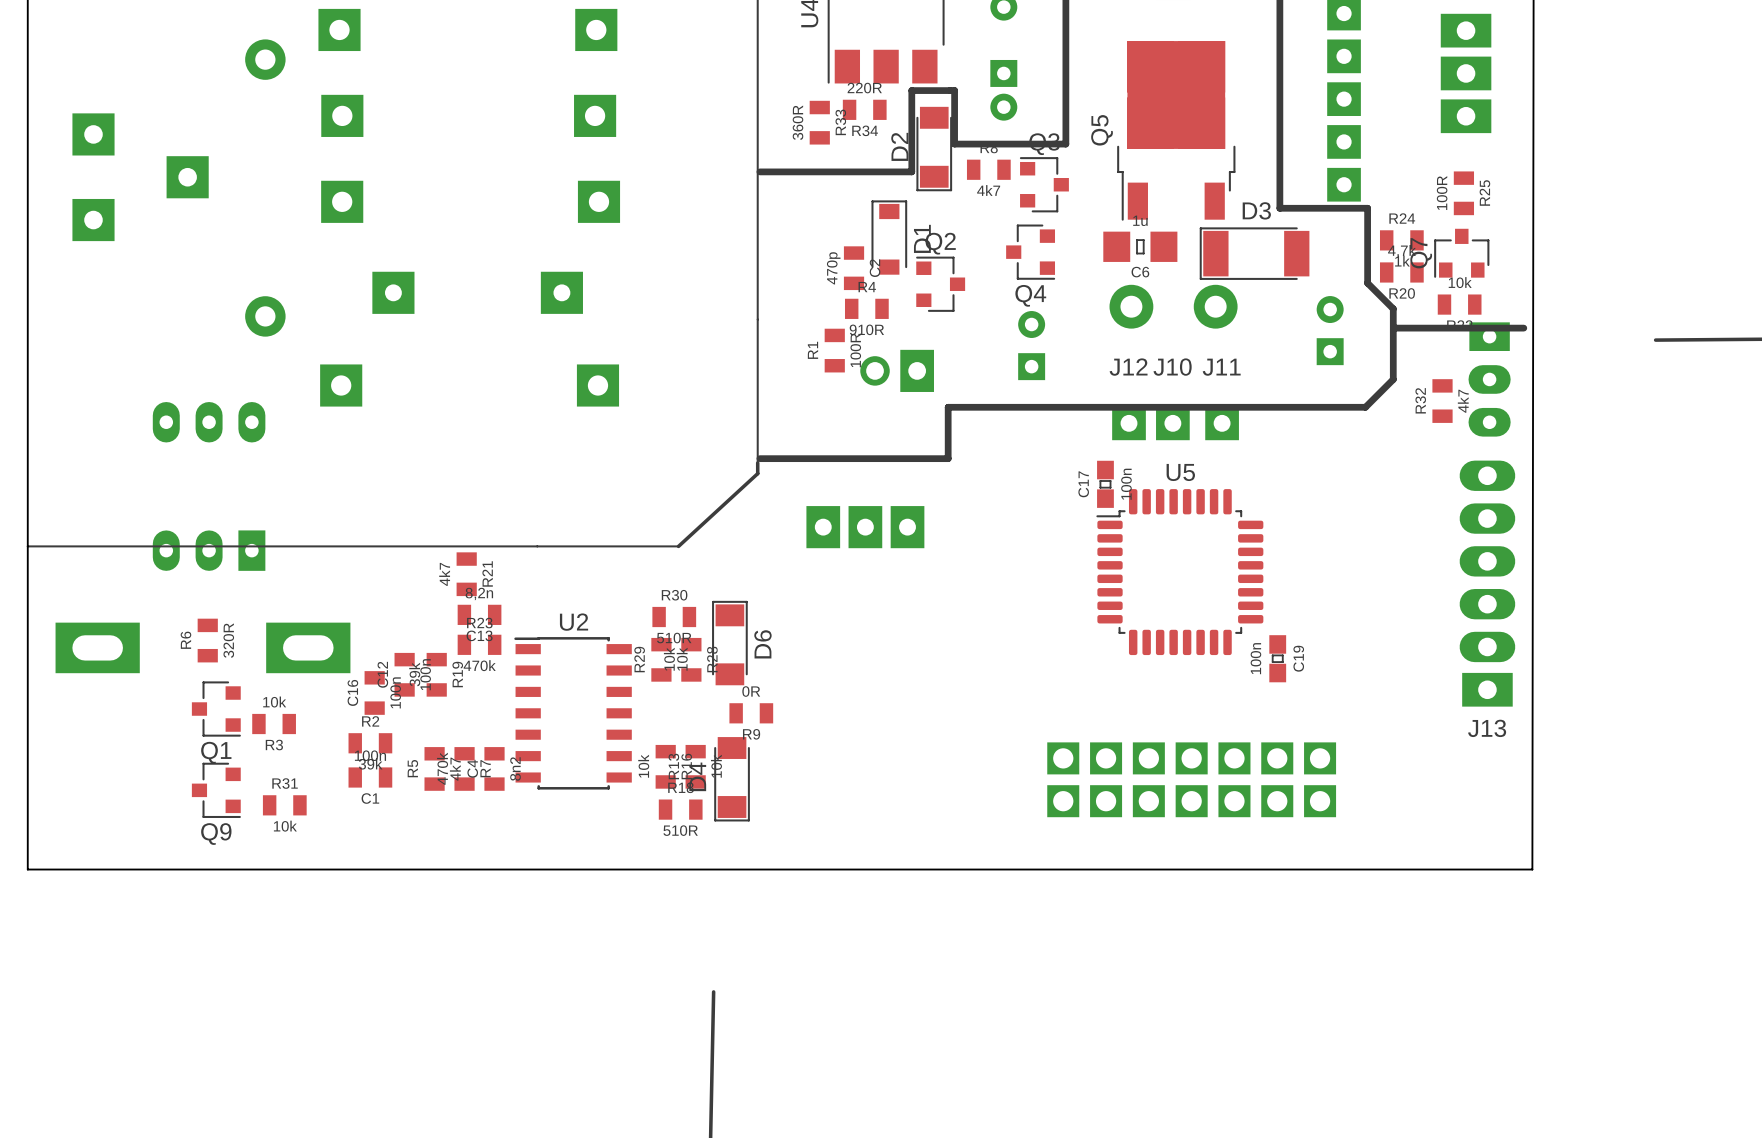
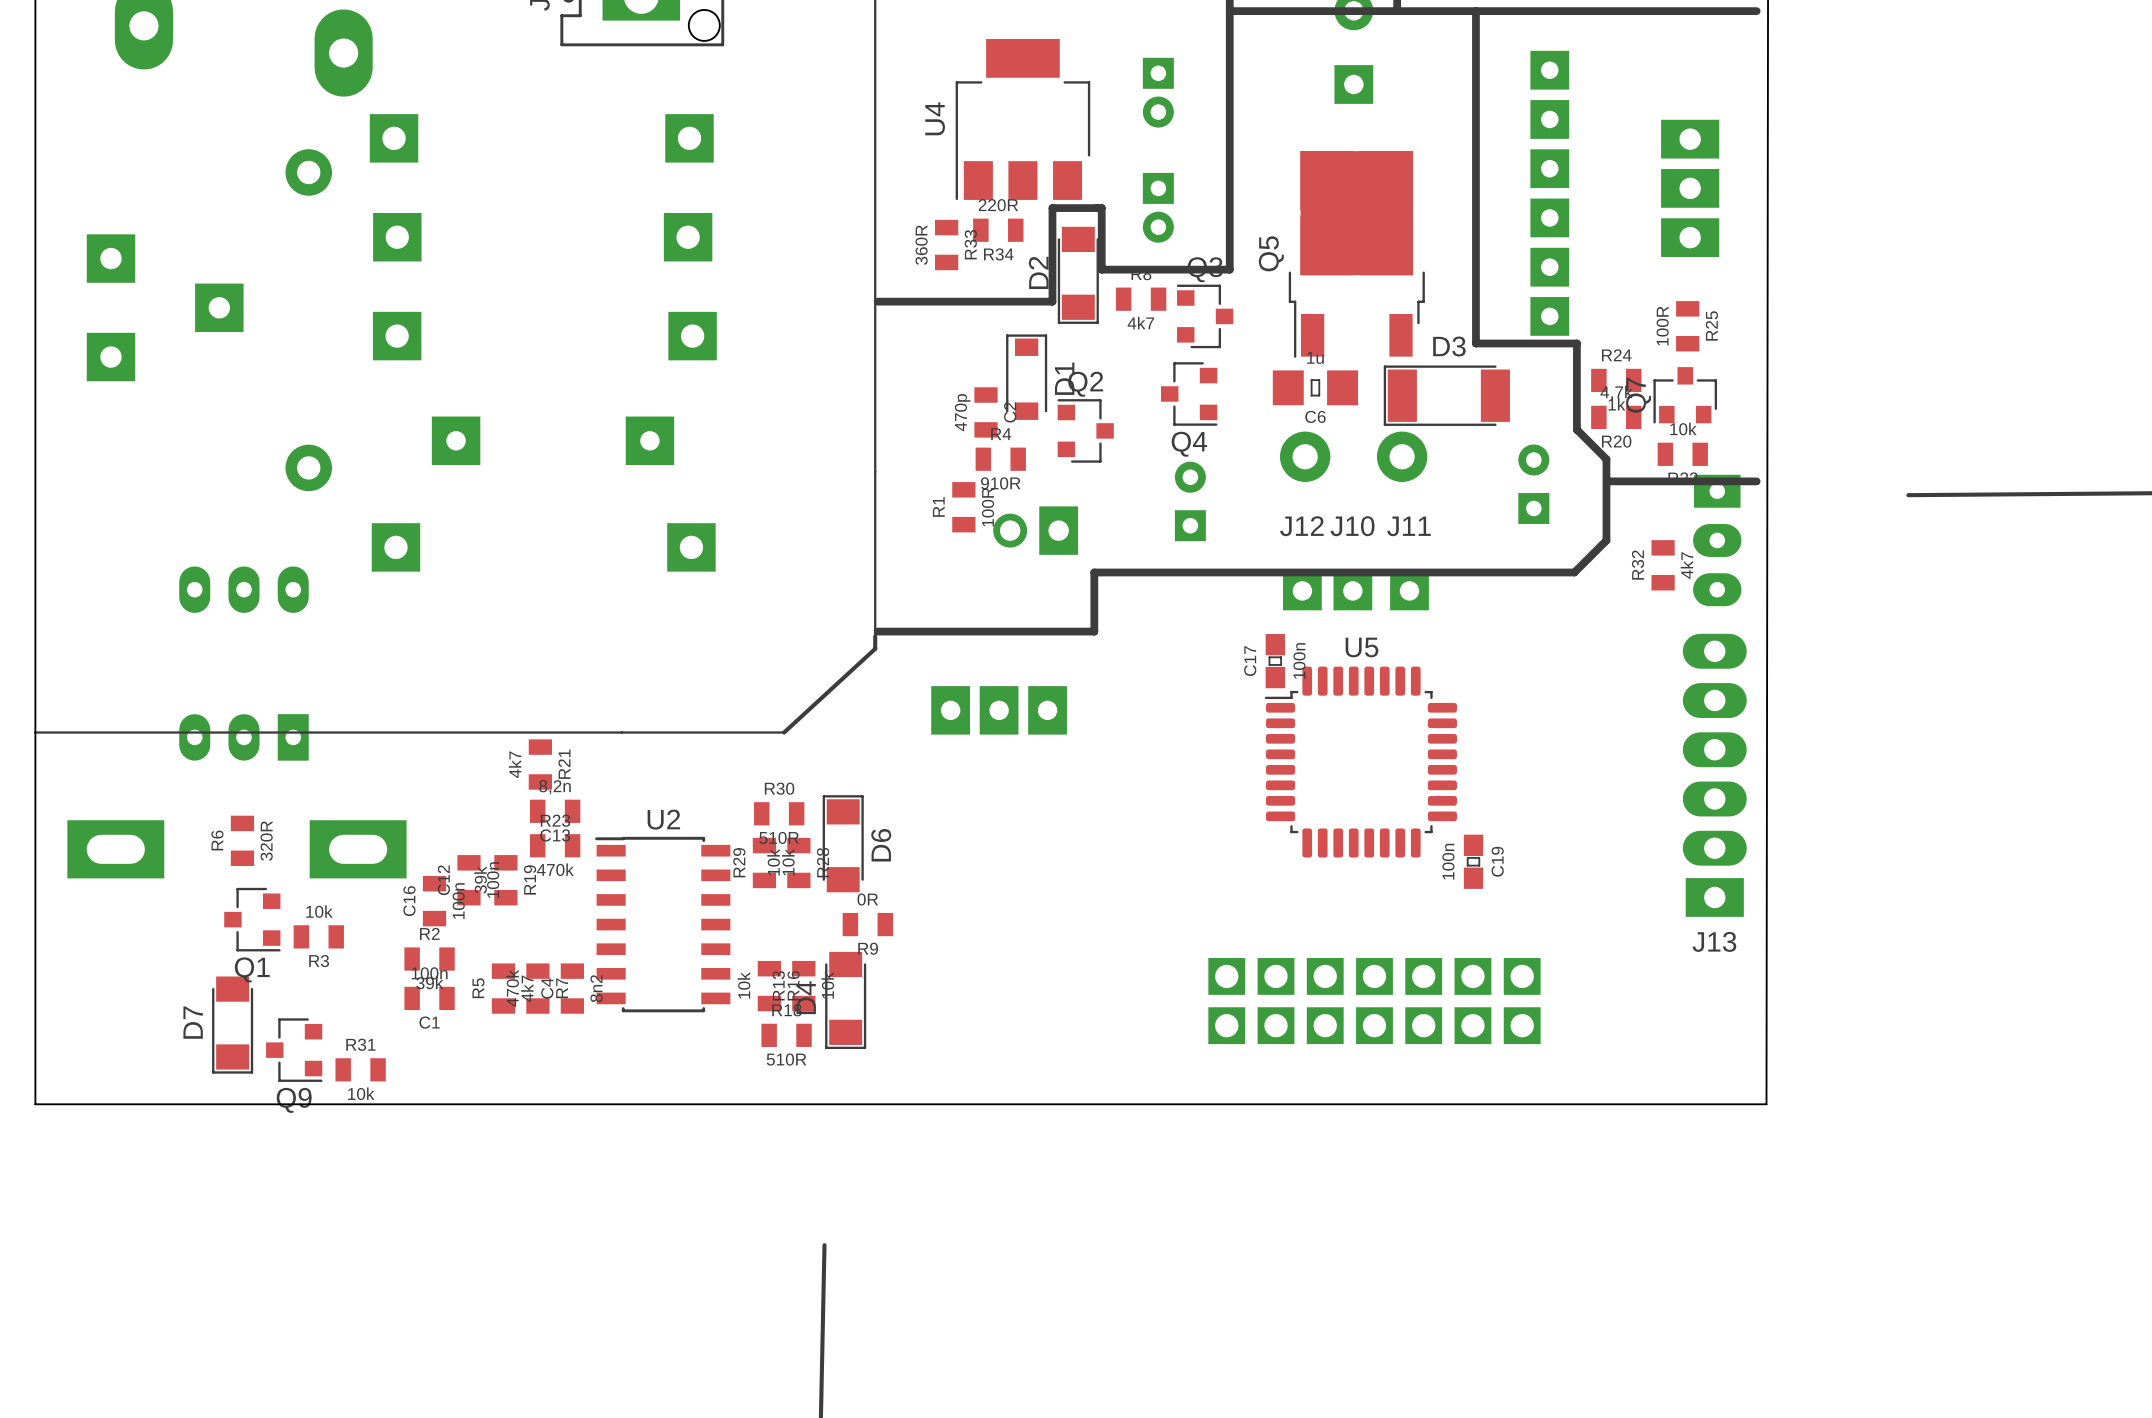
Q9 position: (216, 790) -> (294, 1050)
D7: none -> (232, 1025)
R31 position: (284, 805) -> (360, 1069)

